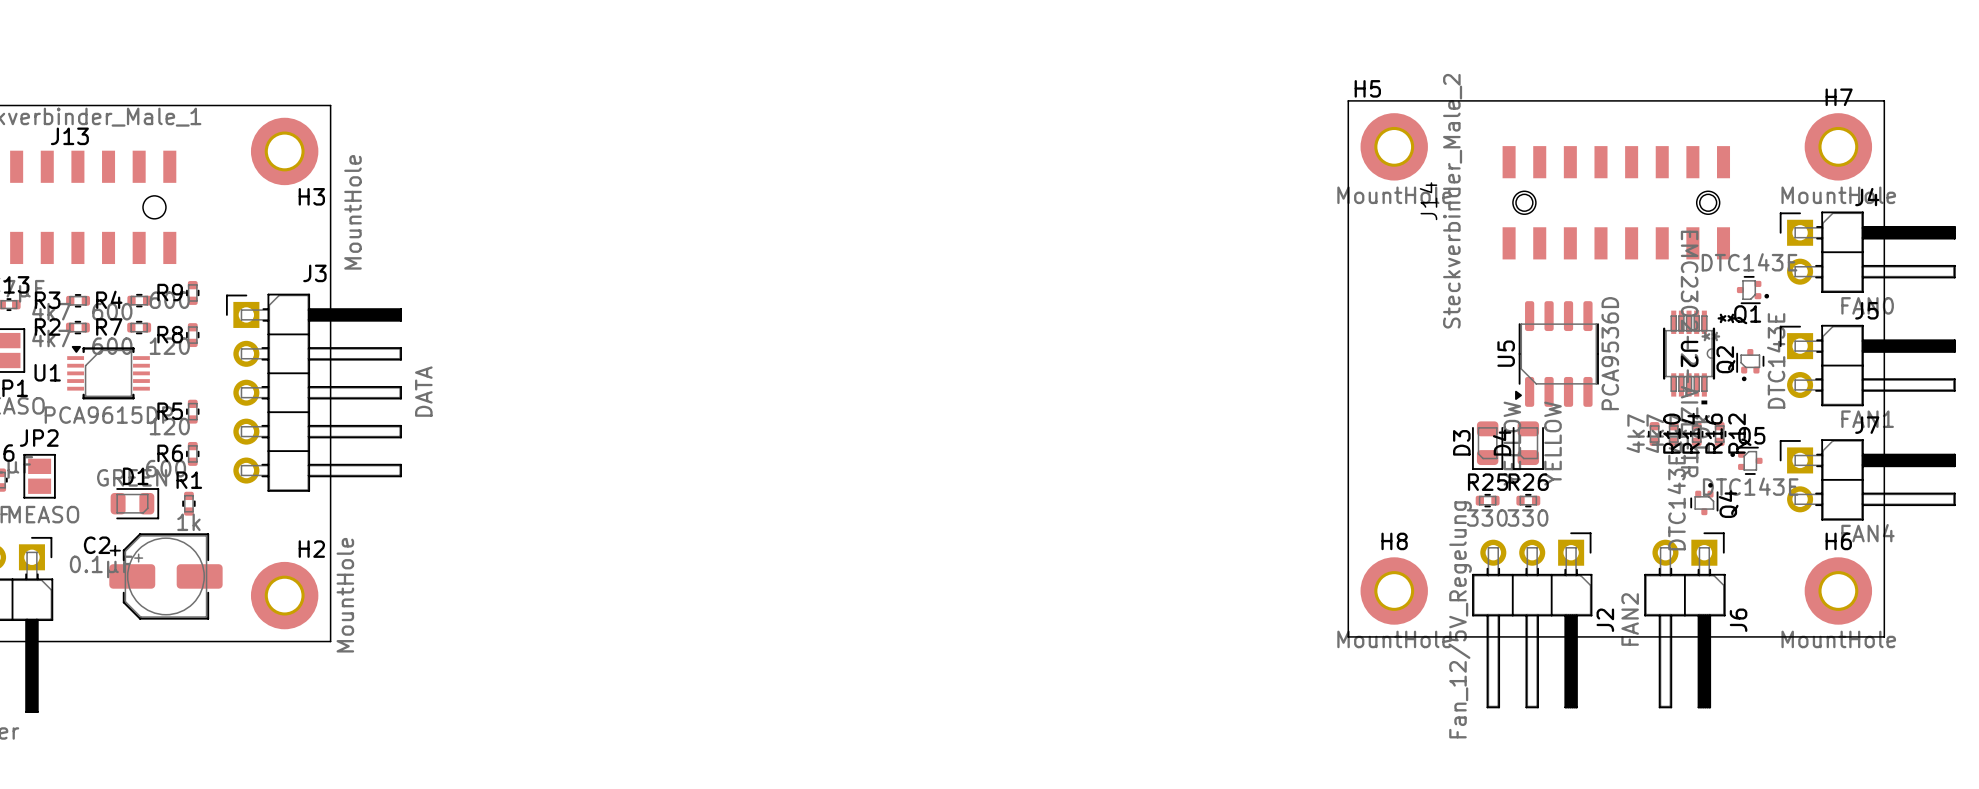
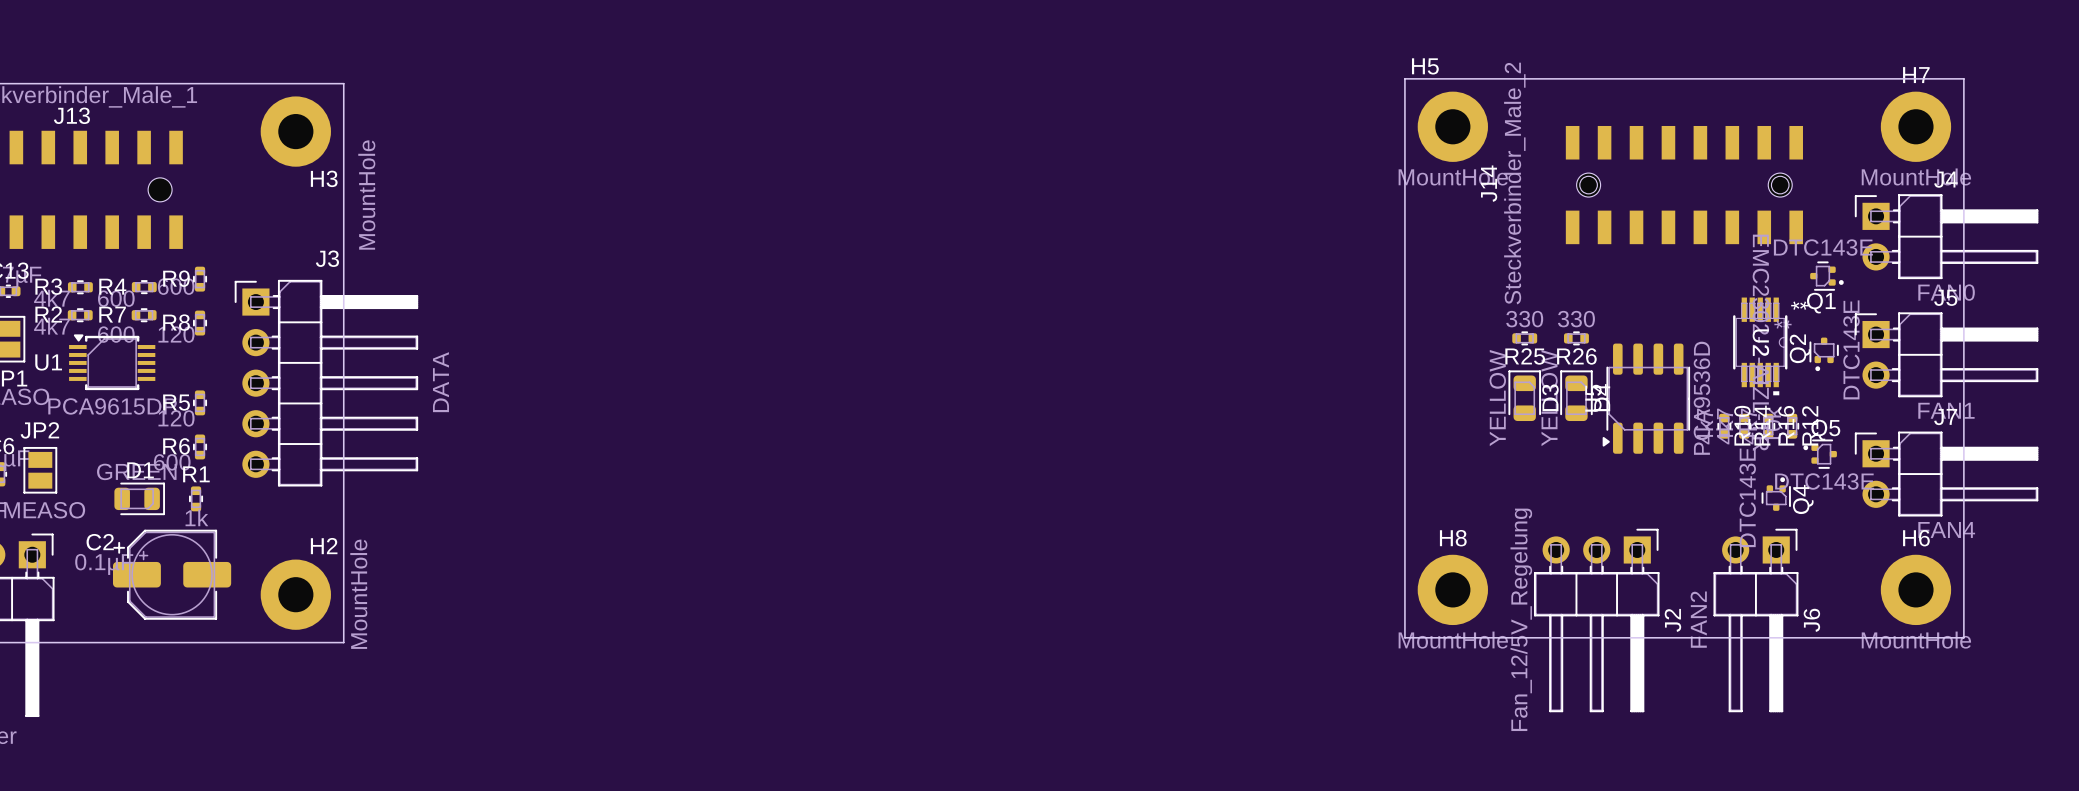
U5 position: (1556, 353) -> (1646, 398)
D3 rotation: 0° (1487, 445) -> 180° (1524, 395)
D3 position: (1487, 445) -> (1524, 395)
D4 rotation: 0° (1528, 445) -> 180° (1576, 395)
D4 position: (1528, 445) -> (1576, 395)
R25 name position: R25 (1488, 482) -> R25 (1525, 356)
R26 name position: R26 (1528, 482) -> R26 (1576, 356)
R25 position: (1487, 500) -> (1524, 338)
R26 position: (1528, 500) -> (1576, 338)
R25 value position: 330 (1487, 517) -> 330 (1524, 319)
R26 value position: 330 (1527, 517) -> 330 (1576, 319)

